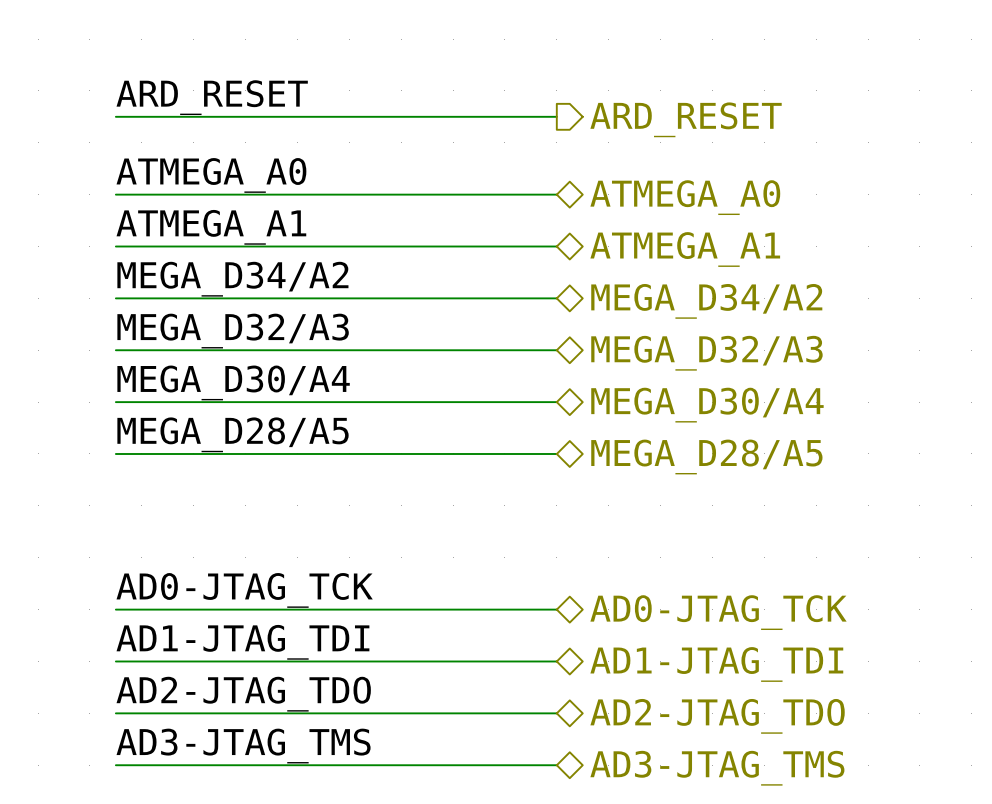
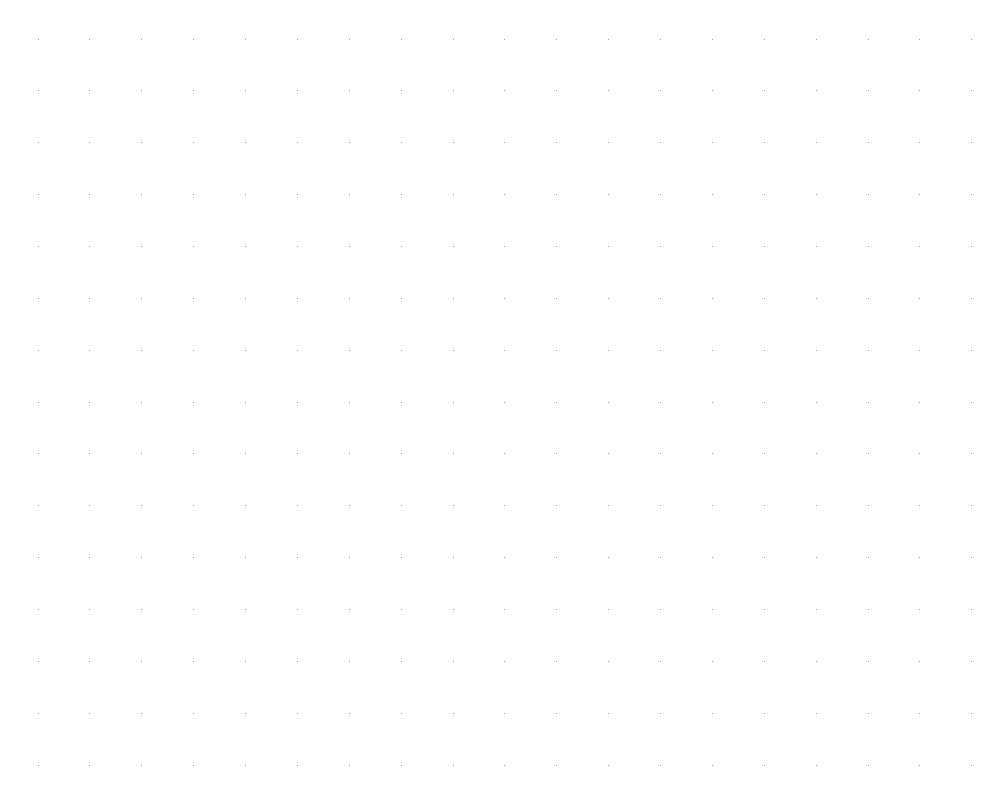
label: ARD_RESET (212, 97) -> none
wire: (115, 116) (556, 116) -> none
hierarchical label: ARD_RESET (686, 119) -> none
label: ATMEGA_A0 (211, 175) -> none
wire: (115, 194) (556, 194) -> none
hierarchical label: ATMEGA_A0 (685, 197) -> none
label: ATMEGA_A1 (211, 227) -> none
wire: (115, 246) (556, 246) -> none
hierarchical label: ATMEGA_A1 (685, 249) -> none
label: MEGA_D34/A2 (232, 279) -> none
wire: (115, 298) (556, 298) -> none
hierarchical label: MEGA_D34/A2 (706, 301) -> none
label: MEGA_D32/A3 (233, 331) -> none
wire: (115, 350) (556, 350) -> none
hierarchical label: MEGA_D32/A3 (706, 353) -> none
label: MEGA_D30/A4 (233, 382) -> none
wire: (115, 402) (556, 402) -> none
hierarchical label: MEGA_D30/A4 (707, 405) -> none
label: MEGA_D28/A5 (233, 434) -> none
wire: (115, 453) (556, 453) -> none
hierarchical label: MEGA_D28/A5 (706, 456) -> none
label: AD0-JTAG_TCK (244, 590) -> none
wire: (115, 609) (556, 609) -> none
hierarchical label: AD0-JTAG_TCK (718, 612) -> none
label: AD1-JTAG_TDI (242, 642) -> none
wire: (115, 661) (556, 661) -> none
hierarchical label: AD1-JTAG_TDI (716, 664) -> none
label: AD2-JTAG_TDO (243, 694) -> none
wire: (115, 713) (556, 713) -> none
hierarchical label: AD2-JTAG_TDO (717, 716) -> none
label: AD3-JTAG_TMS (243, 746) -> none
wire: (115, 765) (556, 765) -> none
hierarchical label: AD3-JTAG_TMS (717, 768) -> none

